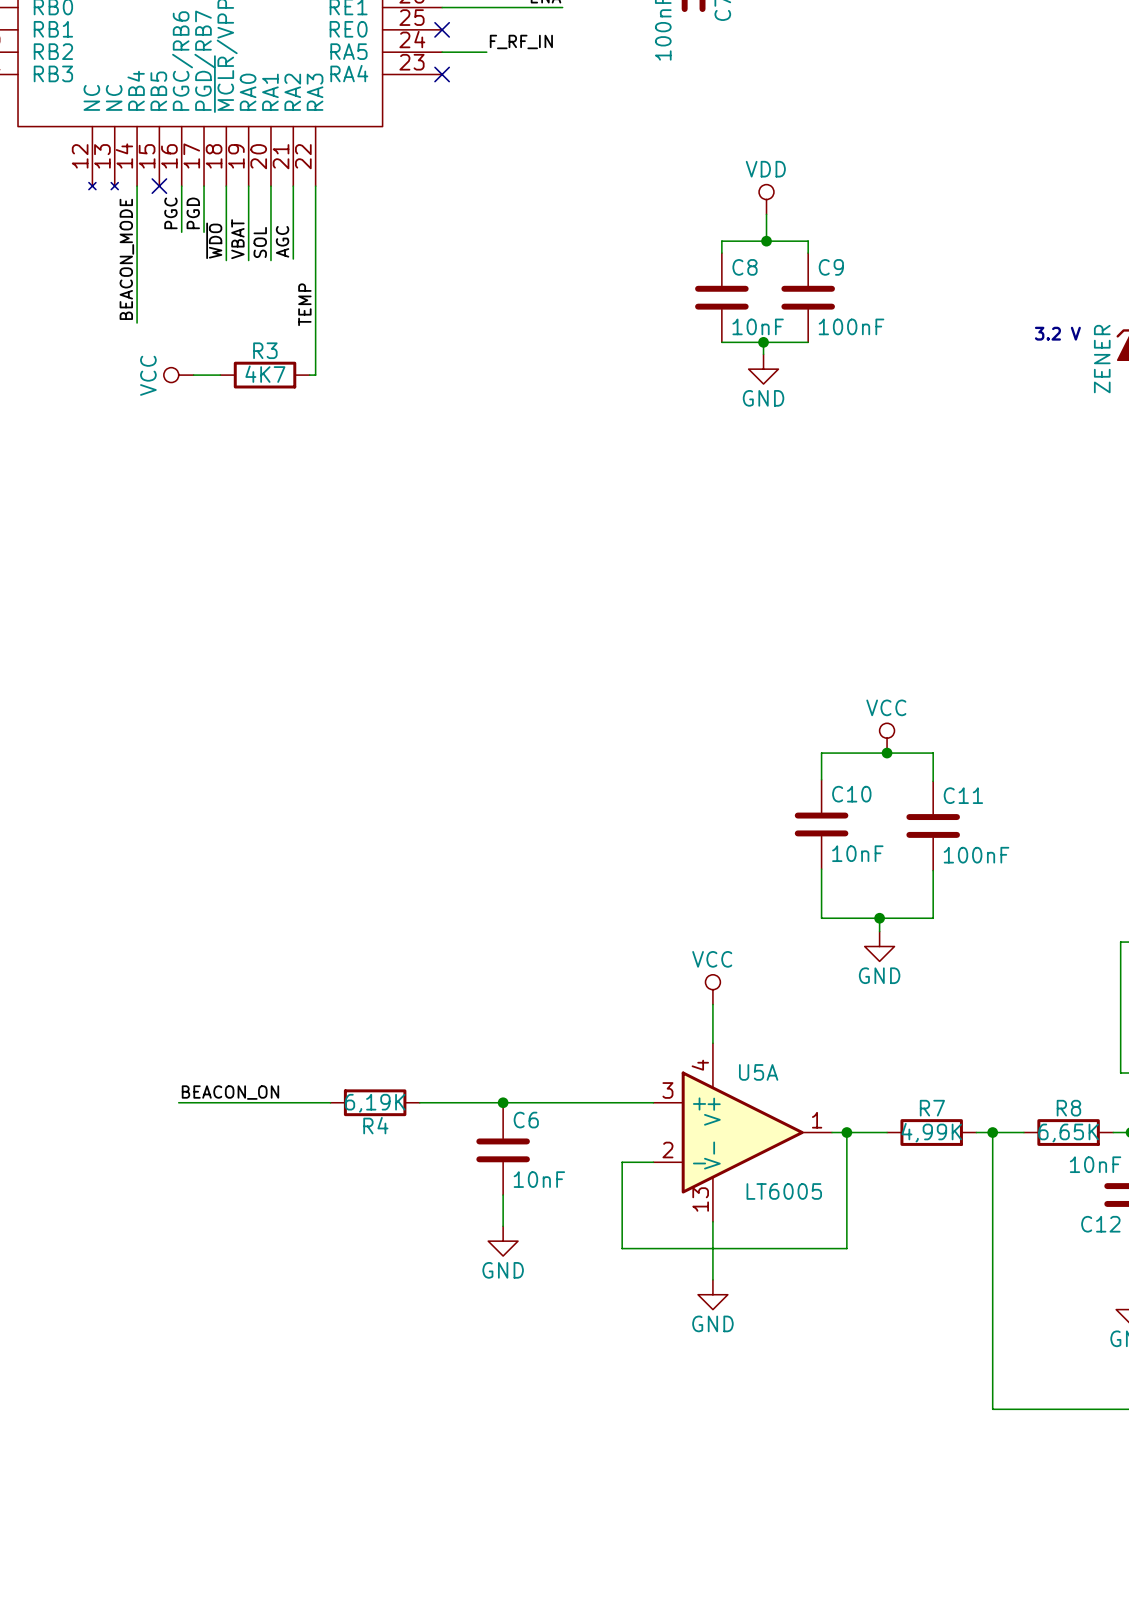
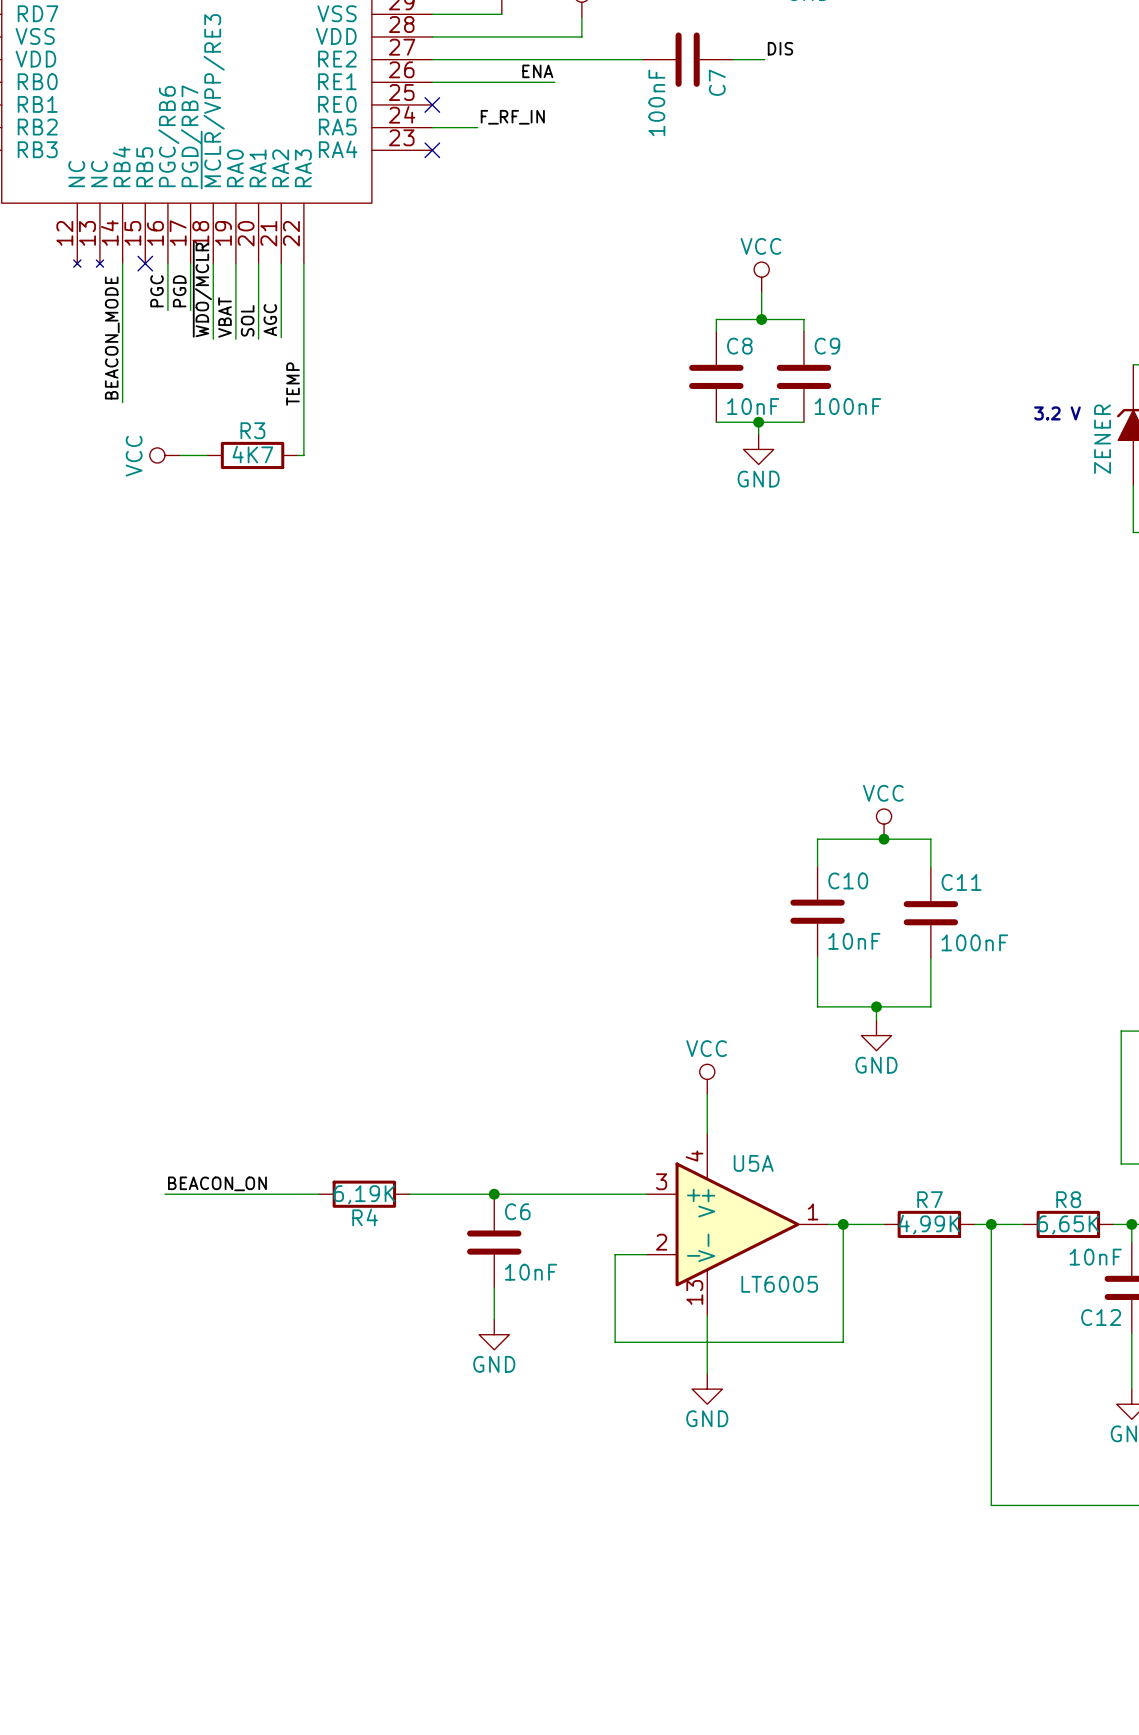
power symbol: VDD (766, 199) -> VCC (761, 277)
label: ~{WDO} (214, 240) -> ~{WDO/MCLR} (202, 289)

